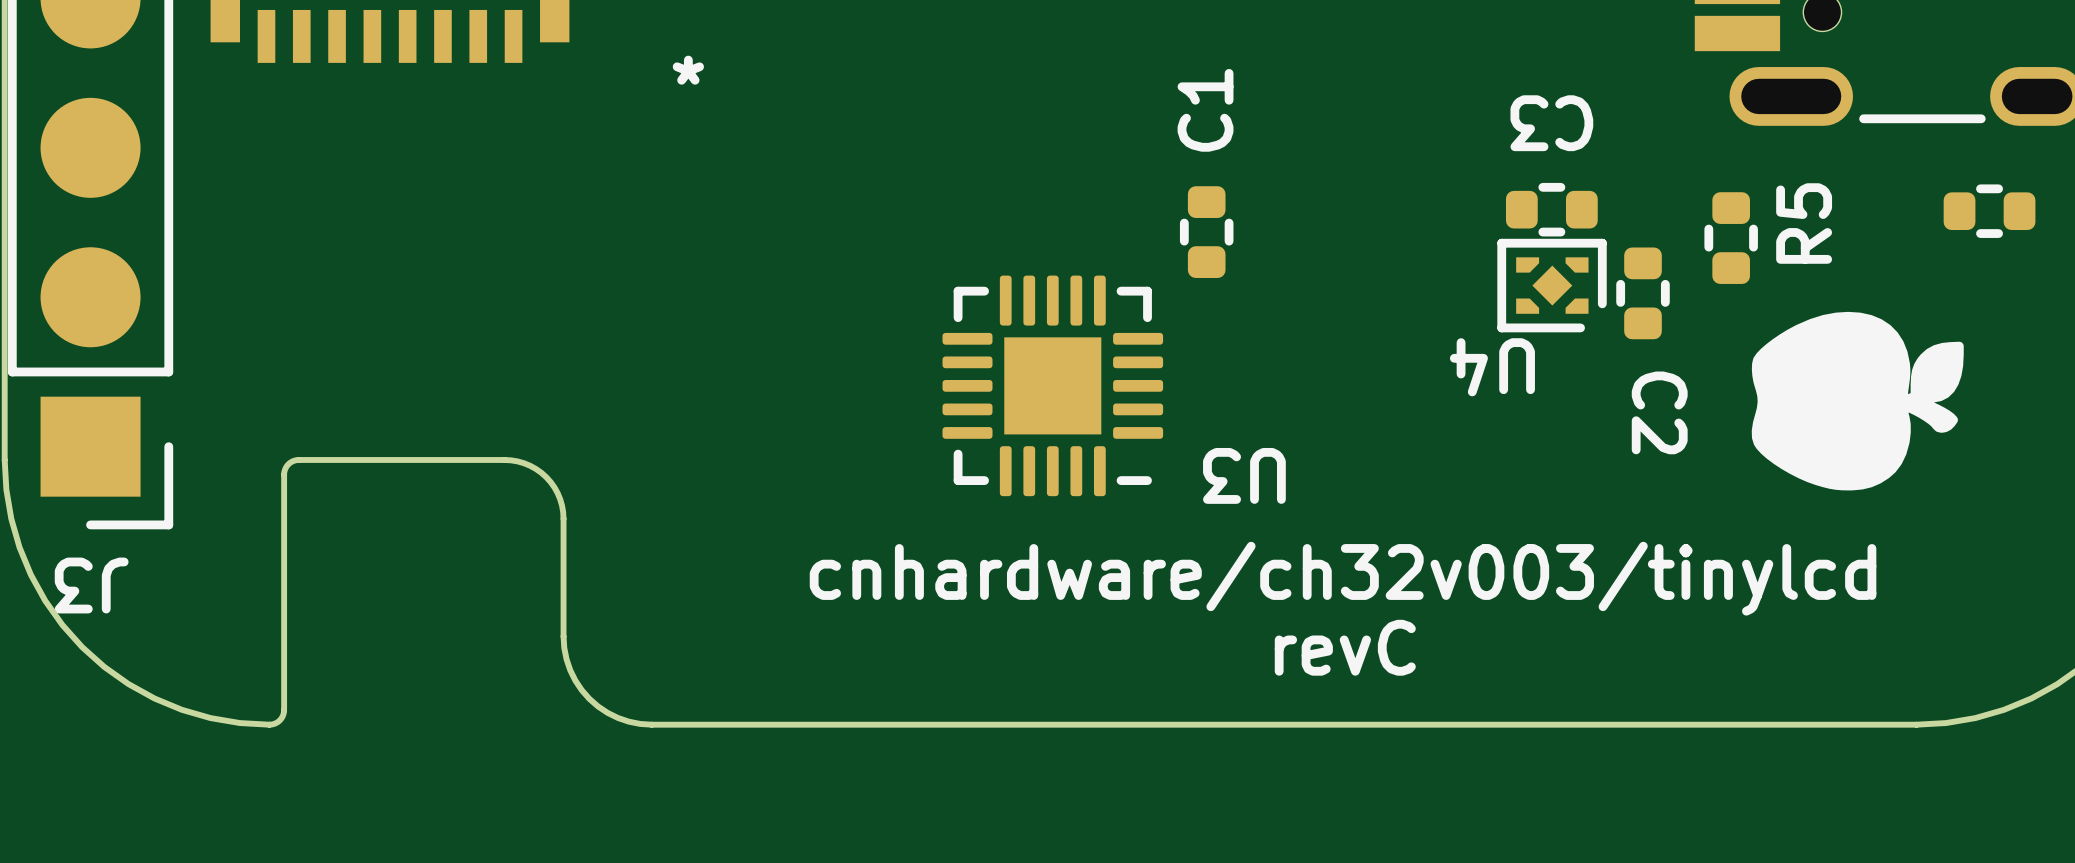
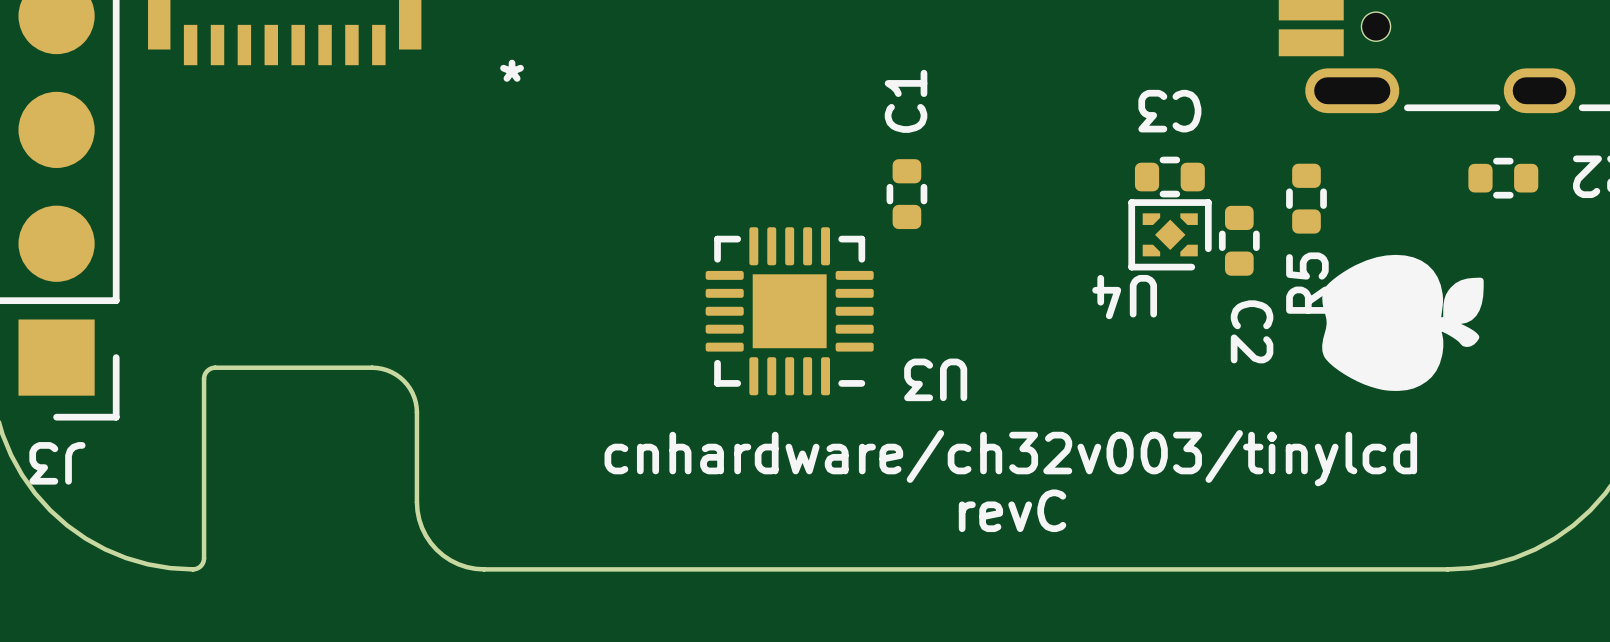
R5 name position: R5 (1804, 223) -> R5 (1307, 283)

